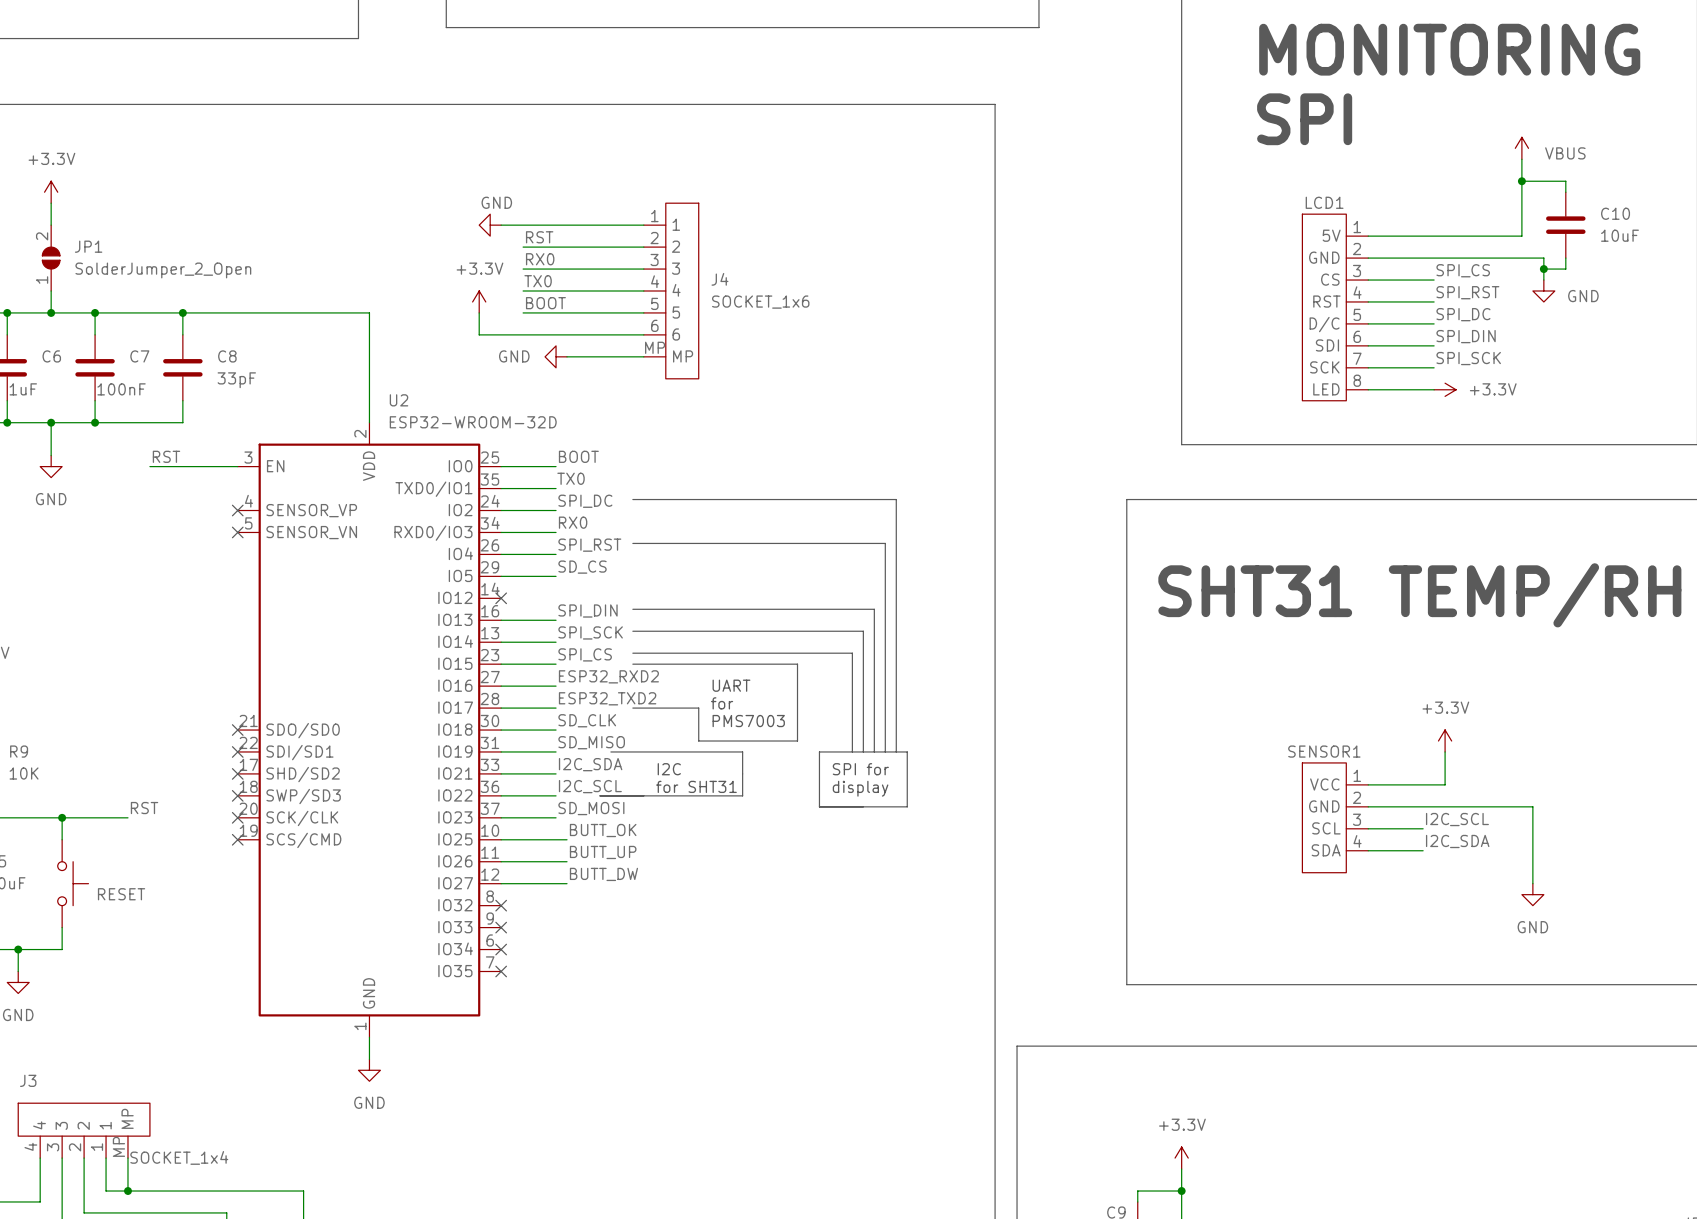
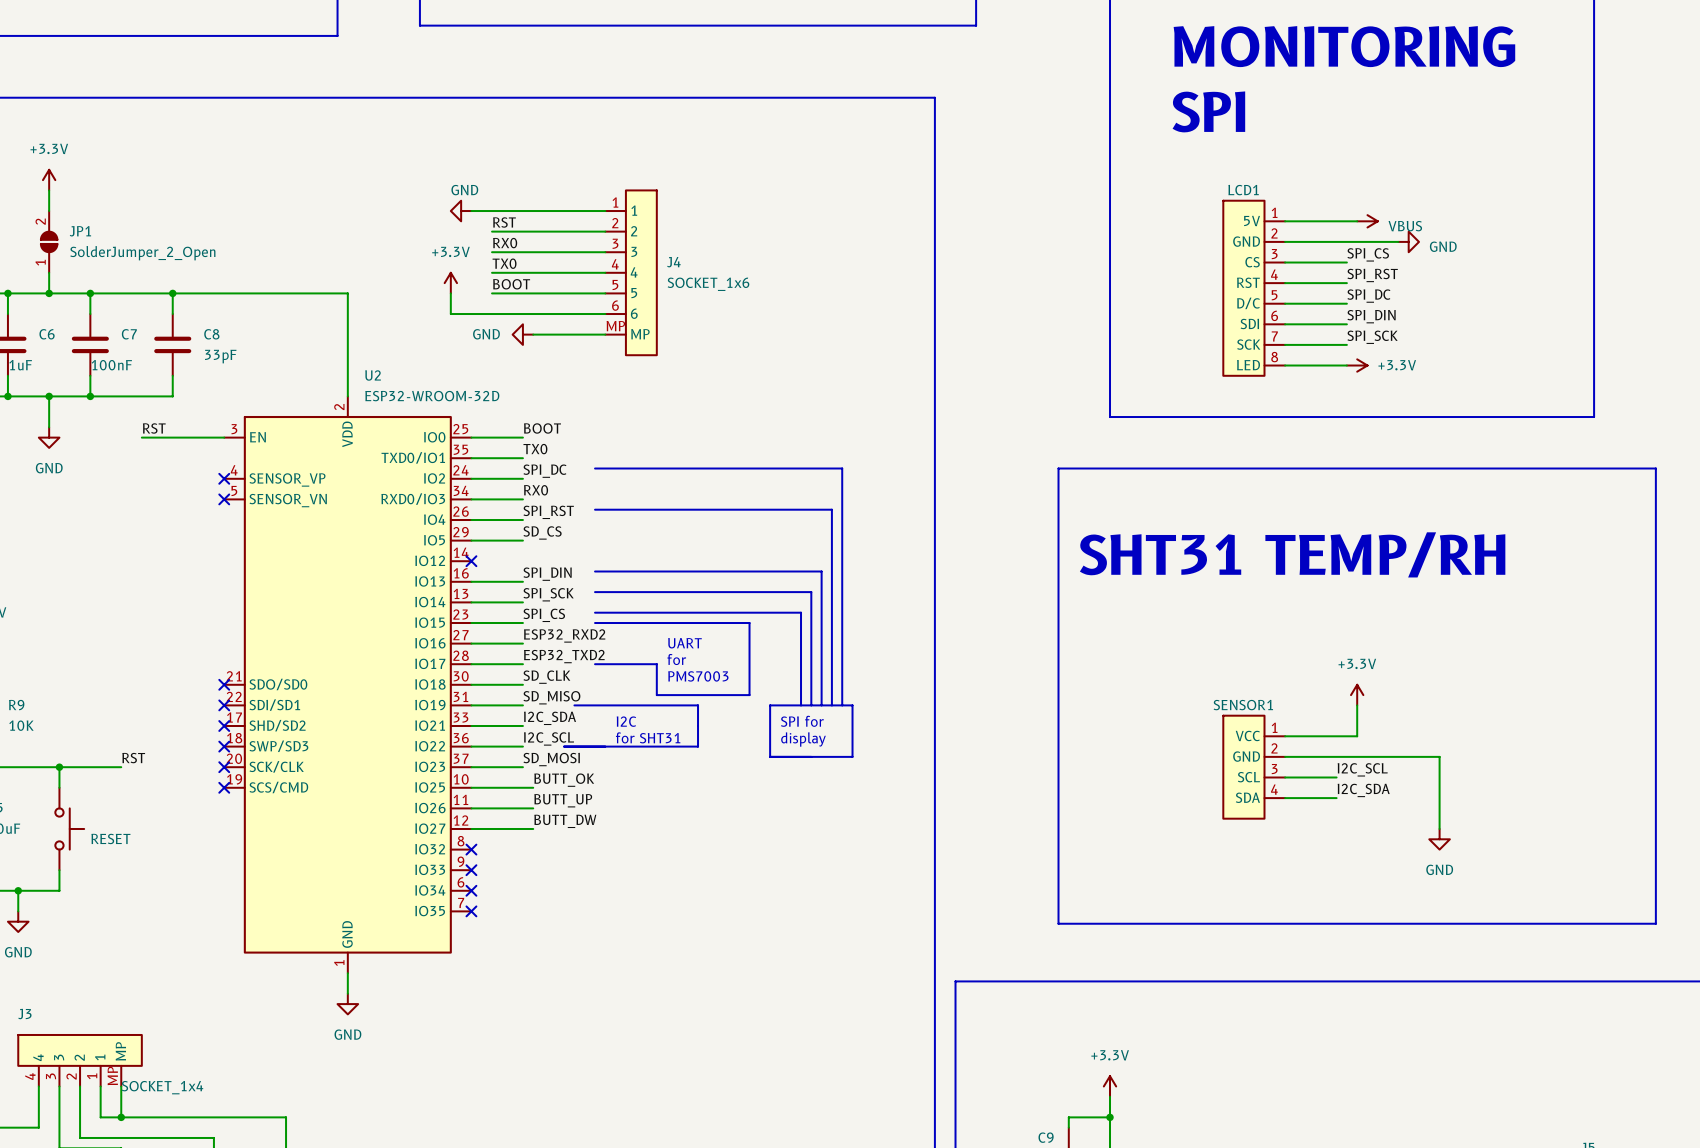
power symbol rotation: 0° (1521, 148) -> 90° clockwise (1367, 221)
power symbol position: VBUS (1521, 148) -> VBUS (1367, 221)
wire: (1521, 159) (1521, 236) (1445, 236) -> none
wire: (1521, 181) (1565, 181) (1565, 192) -> none
junction: (1521, 181) -> none
C10: 10uF (1565, 225) -> none
wire: (1488, 258) (1543, 258) (1543, 280) -> none
wire: (1565, 258) (1565, 269) (1543, 269) -> none
junction: (1543, 269) -> none
power symbol rotation: 0° (1543, 291) -> 90° counterclockwise (1408, 241)
power symbol position: GND (1543, 291) -> GND (1408, 241)

